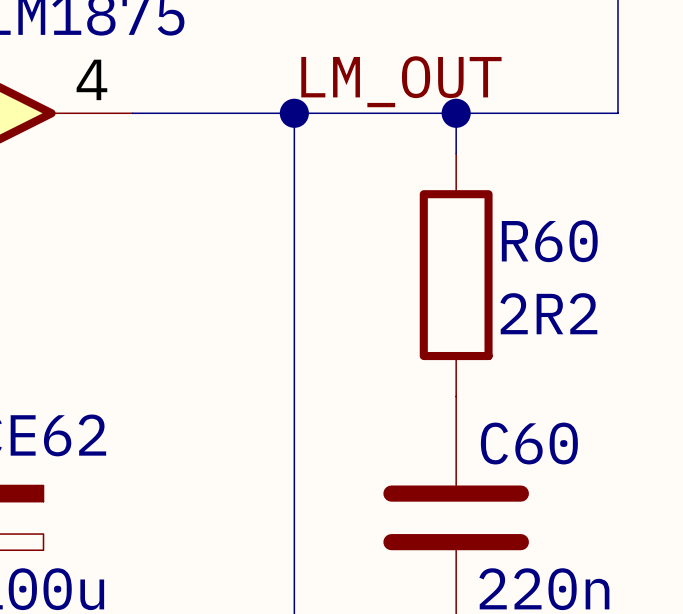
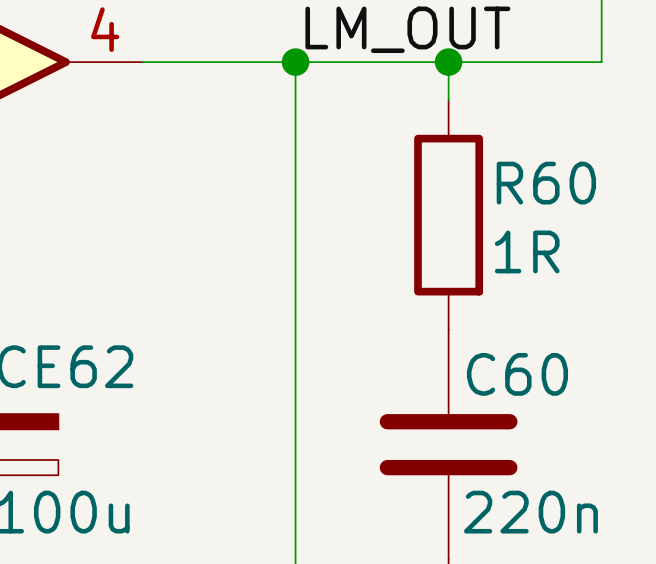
R60 value: 2R2 (548, 313) -> 1R (527, 251)

